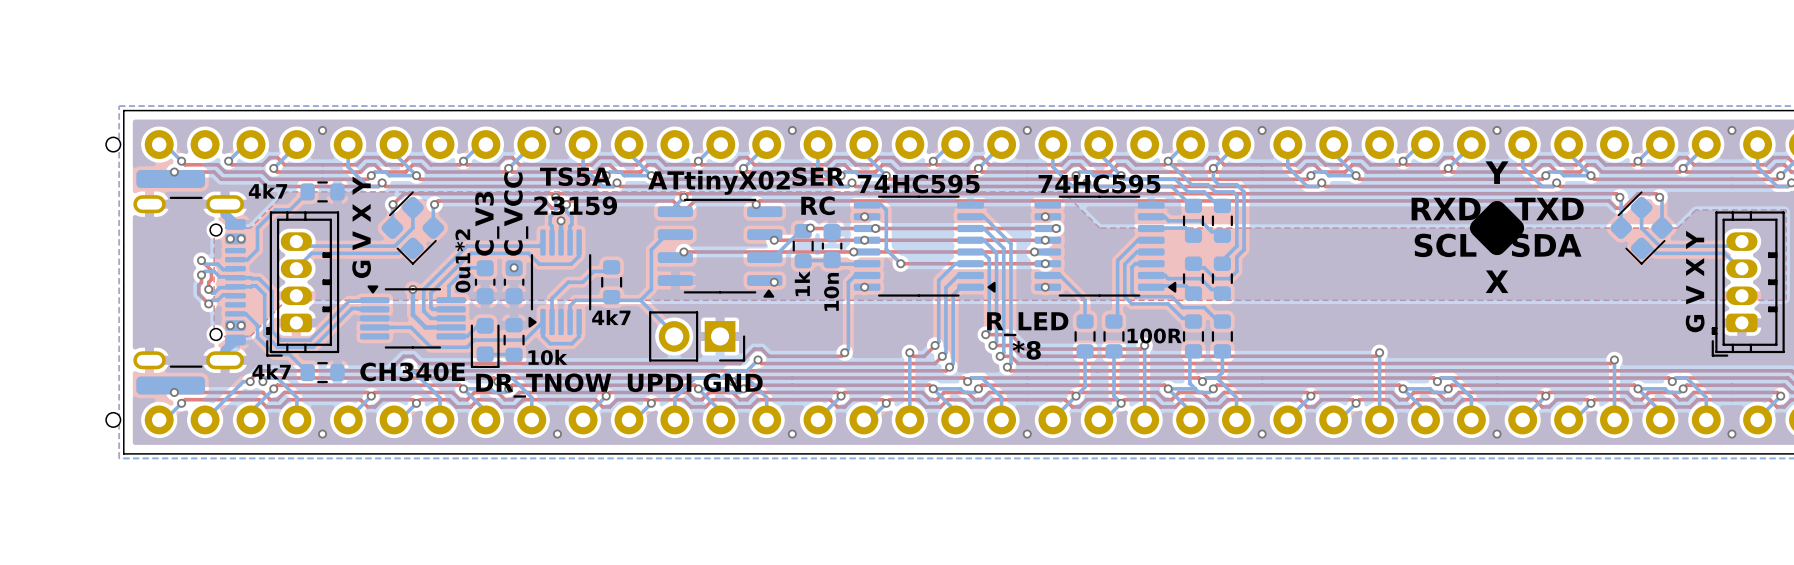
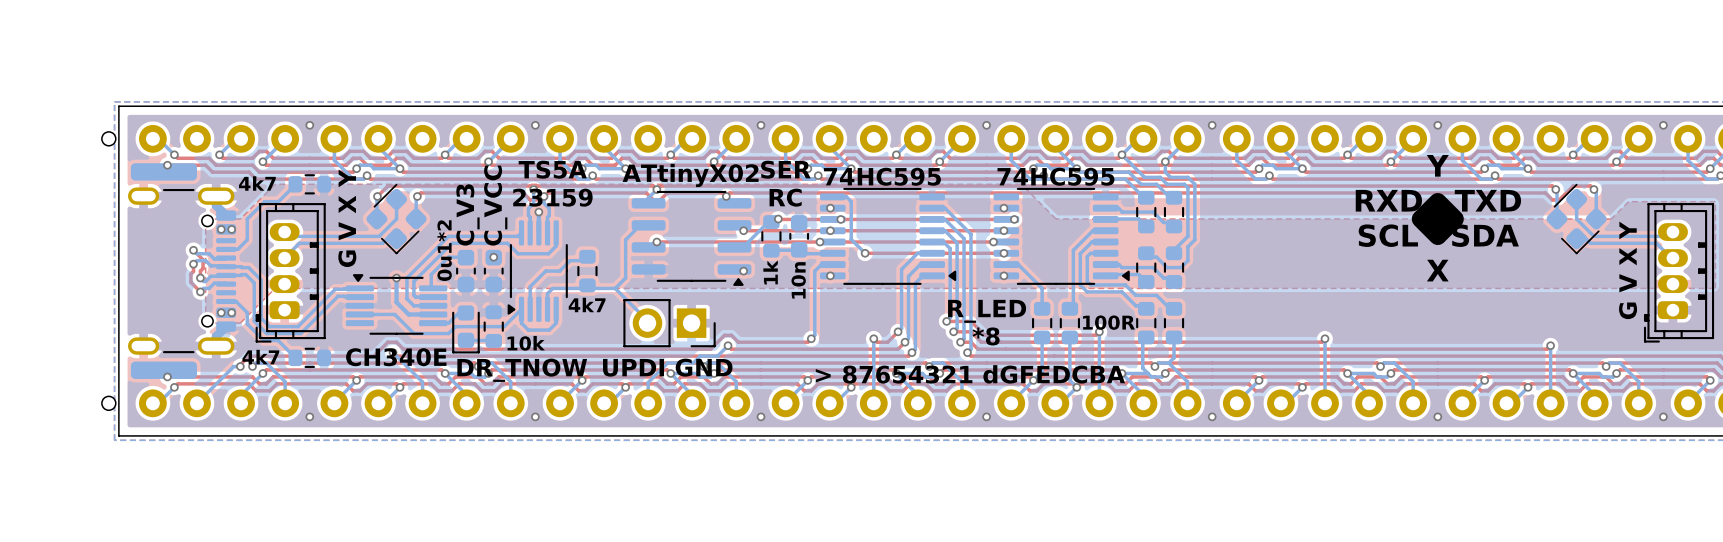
text: none -> > 87654321 dGFEDCBA (970, 374)

